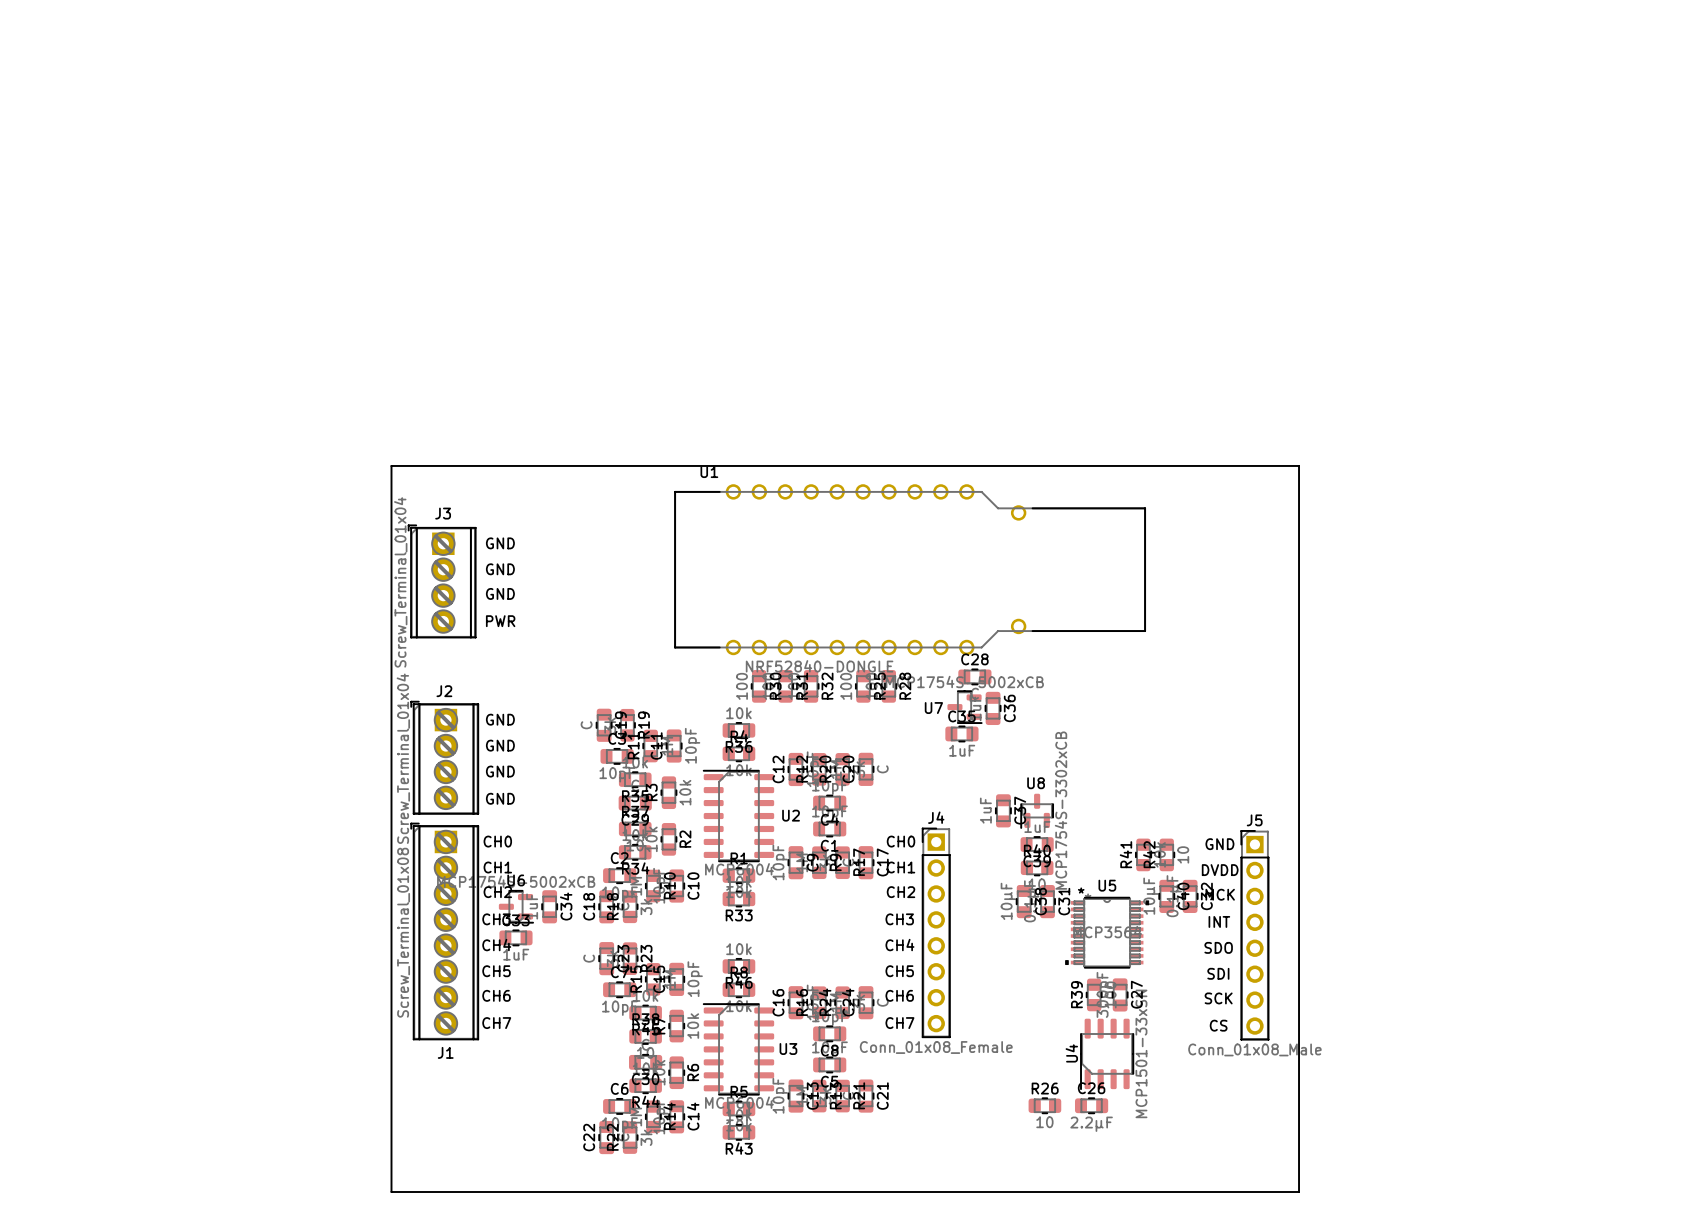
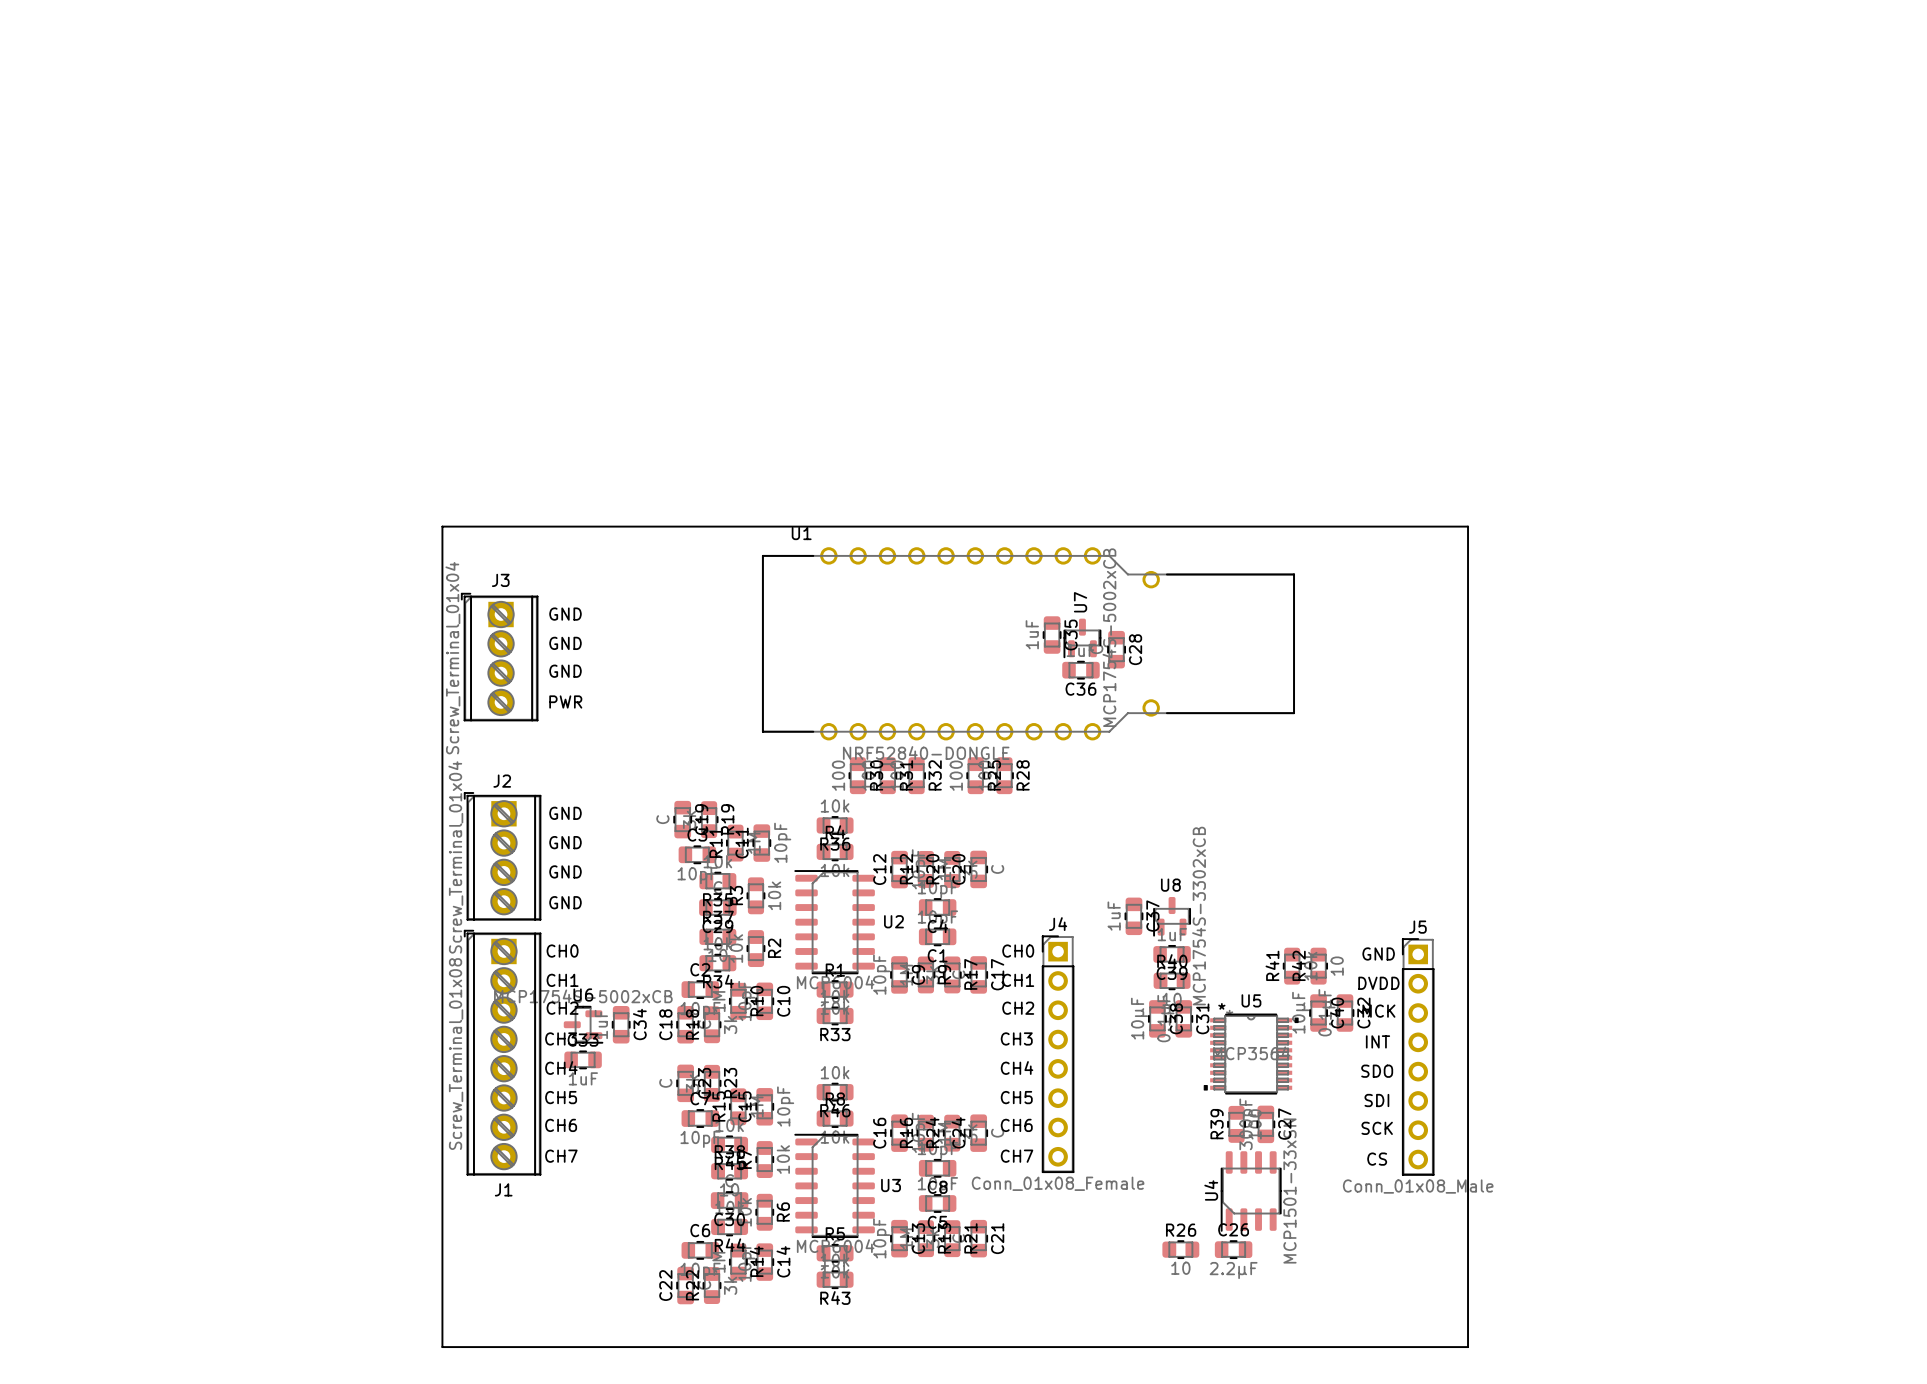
C28 rotation: 0° (974, 676) -> 90° clockwise (1116, 649)
C28 position: (974, 676) -> (1116, 649)
U7 rotation: 0° (964, 707) -> 90° clockwise (1082, 638)
U7 position: (964, 707) -> (1082, 638)
C36 rotation: 0° (993, 708) -> 90° clockwise (1080, 670)
C36 position: (993, 708) -> (1080, 670)
C35 rotation: 0° (961, 733) -> 90° clockwise (1052, 635)
C35 position: (961, 733) -> (1052, 635)

